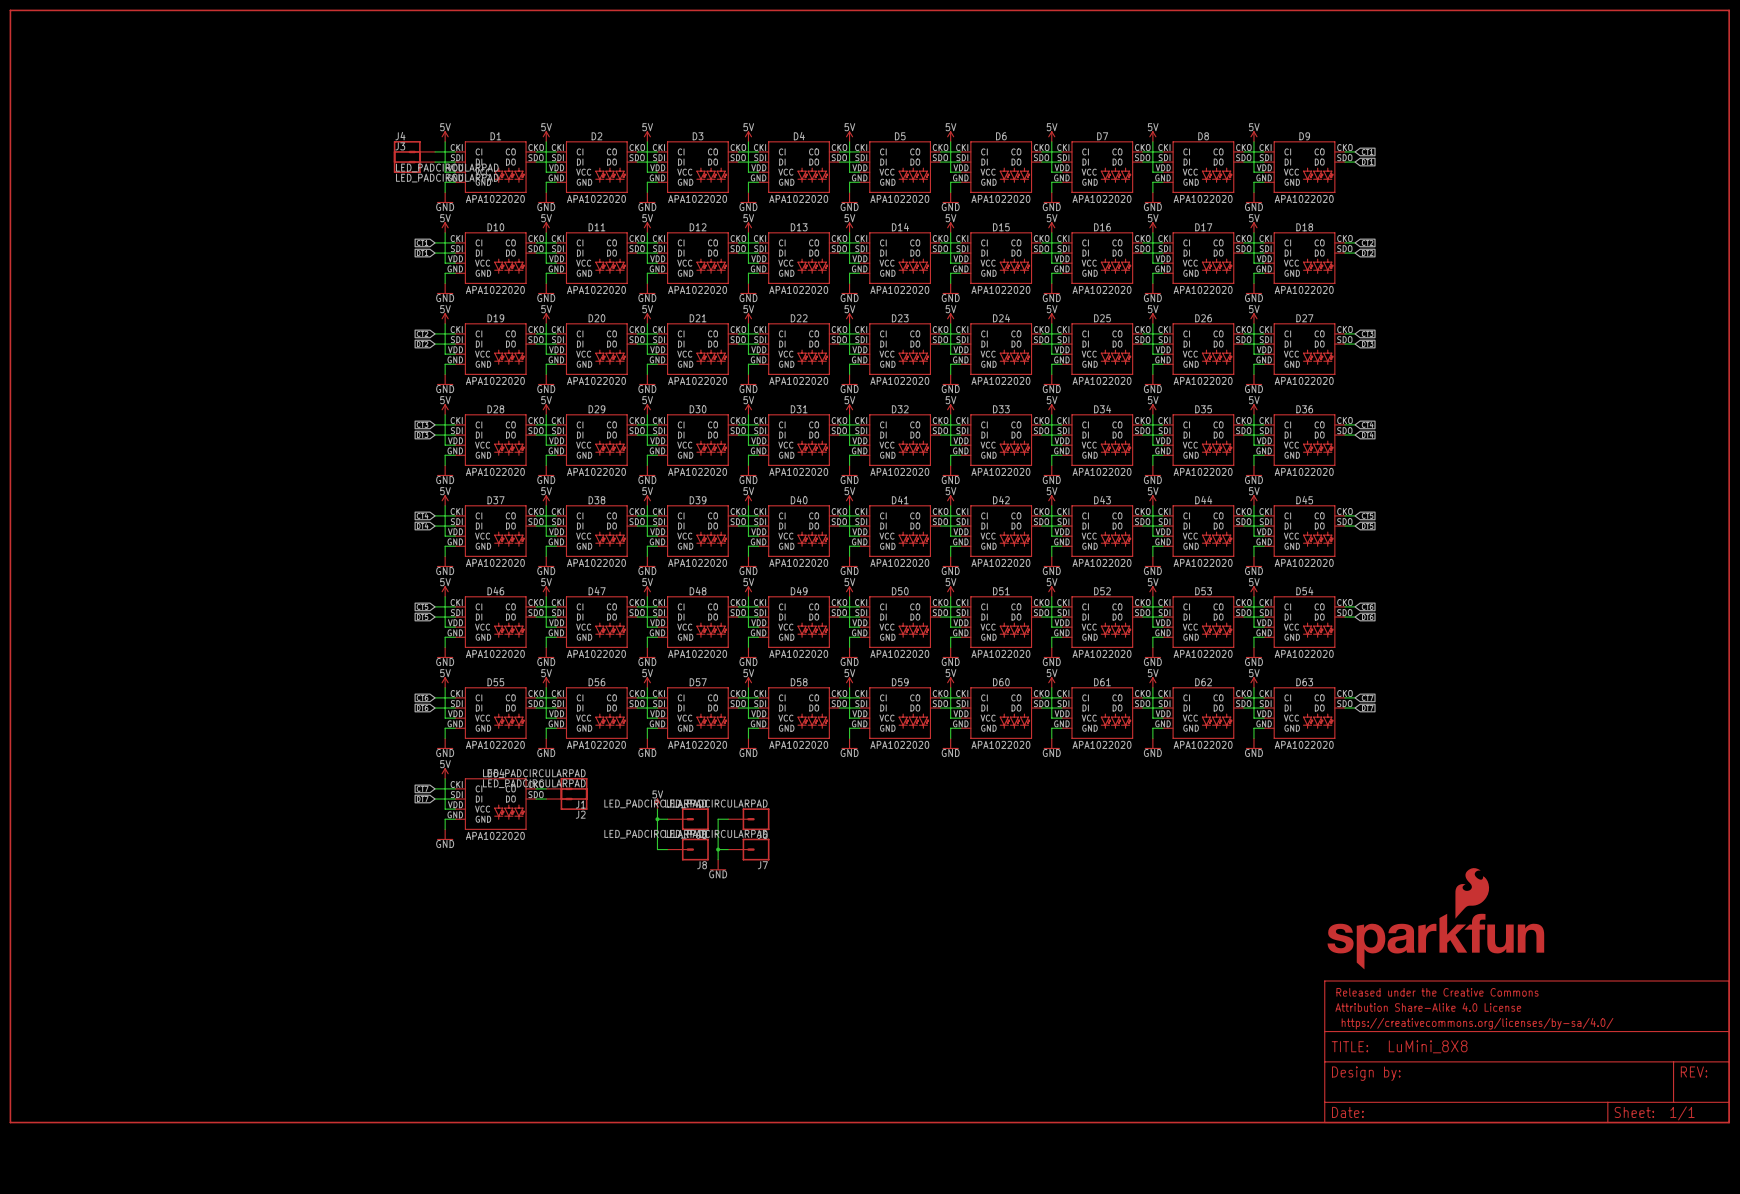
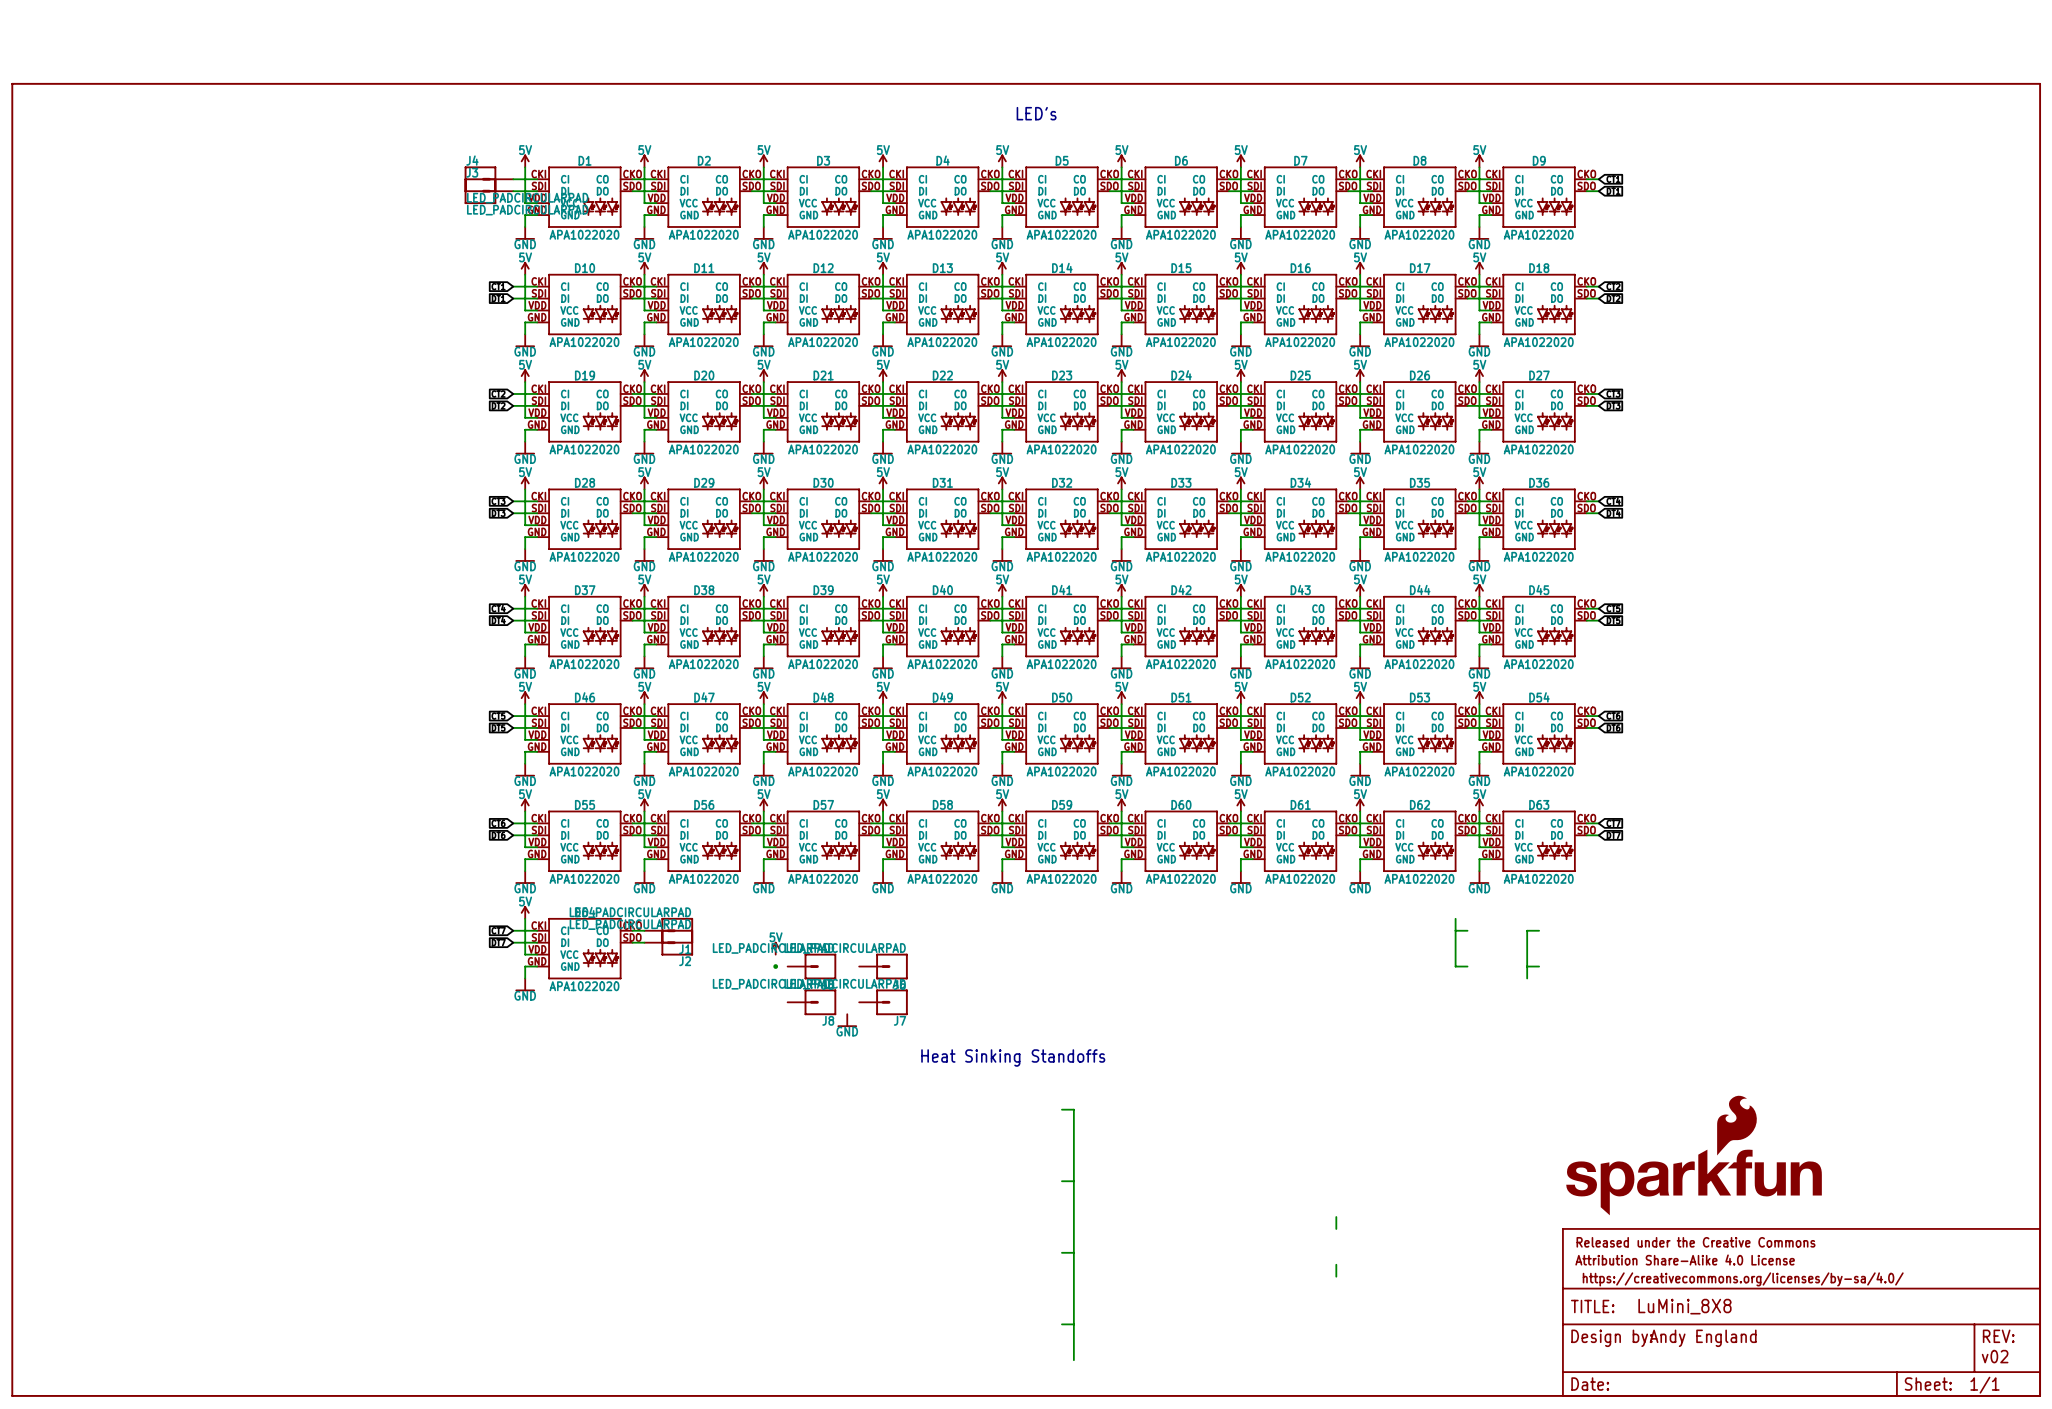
text: none -> LED's (1036, 113)
part position: (869, 566) -> (1026, 739)
wire: none -> (1455, 918) (1455, 966) (1467, 966)
wire: none -> (1455, 930) (1467, 930)
wire: none -> (1539, 930) (1527, 930) (1527, 978)
wire: (657, 809) (657, 849) (667, 849) -> none
wire: (657, 819) (667, 819) -> none
wire: (728, 819) (718, 819) (718, 859) -> none
wire: none -> (1527, 966) (1539, 966)
wire: (718, 849) (728, 849) -> none
junction: (718, 849) -> none
text: none -> Heat Sinking Standoffs (1013, 1057)
part position: (1435, 918) -> (1694, 1155)
wire: none -> (1061, 1109) (1073, 1109) (1073, 1360)
wire: none -> (1061, 1181) (1073, 1181)
wire: none -> (1336, 1217) (1336, 1228)
part position: (1526, 1051) -> (1801, 1312)
wire: none -> (1061, 1252) (1073, 1252)
wire: none -> (1336, 1264) (1336, 1276)
text: none -> Andy England (1703, 1338)
text: none -> v02 (1995, 1356)

